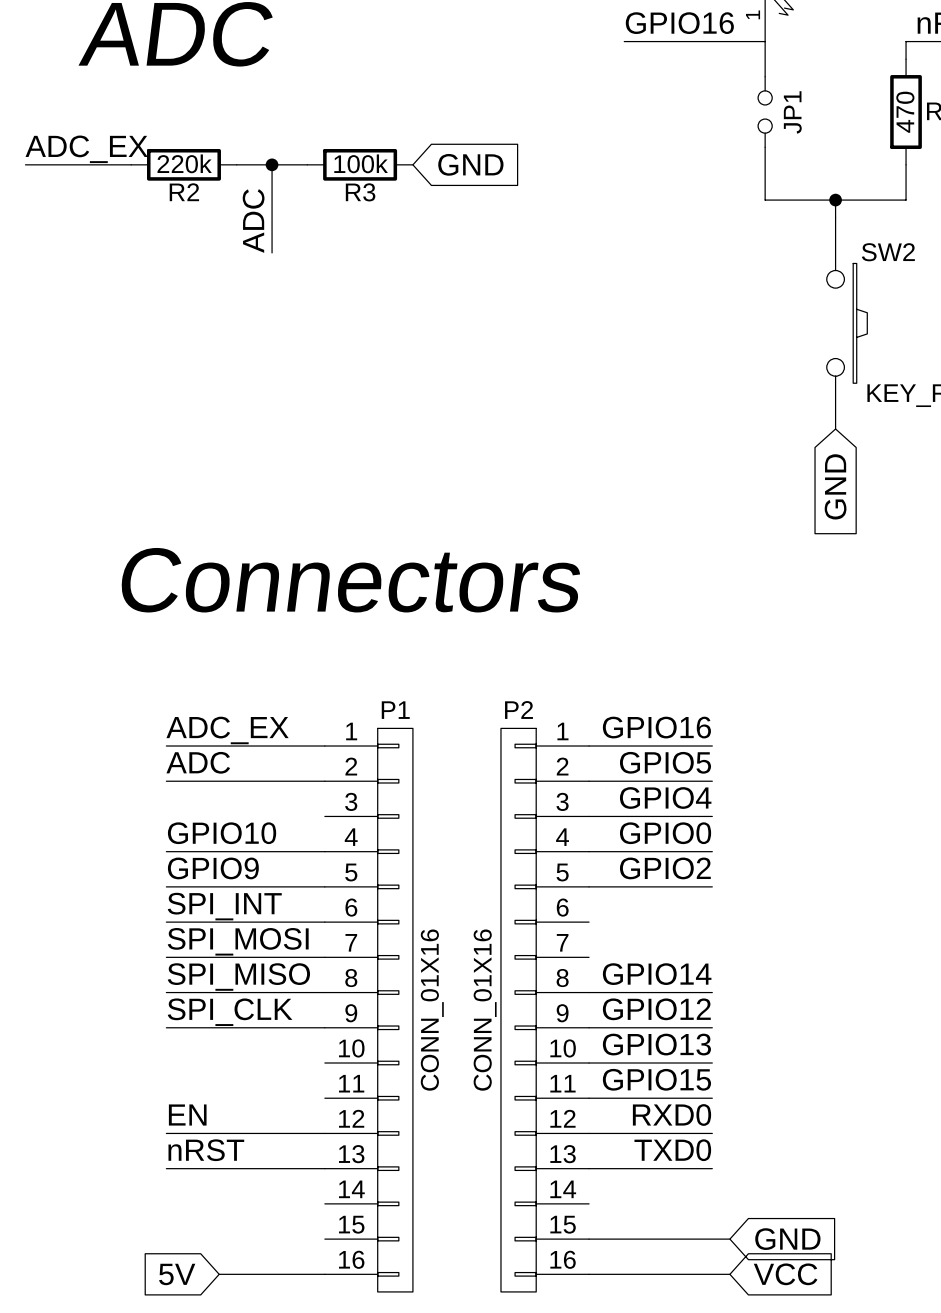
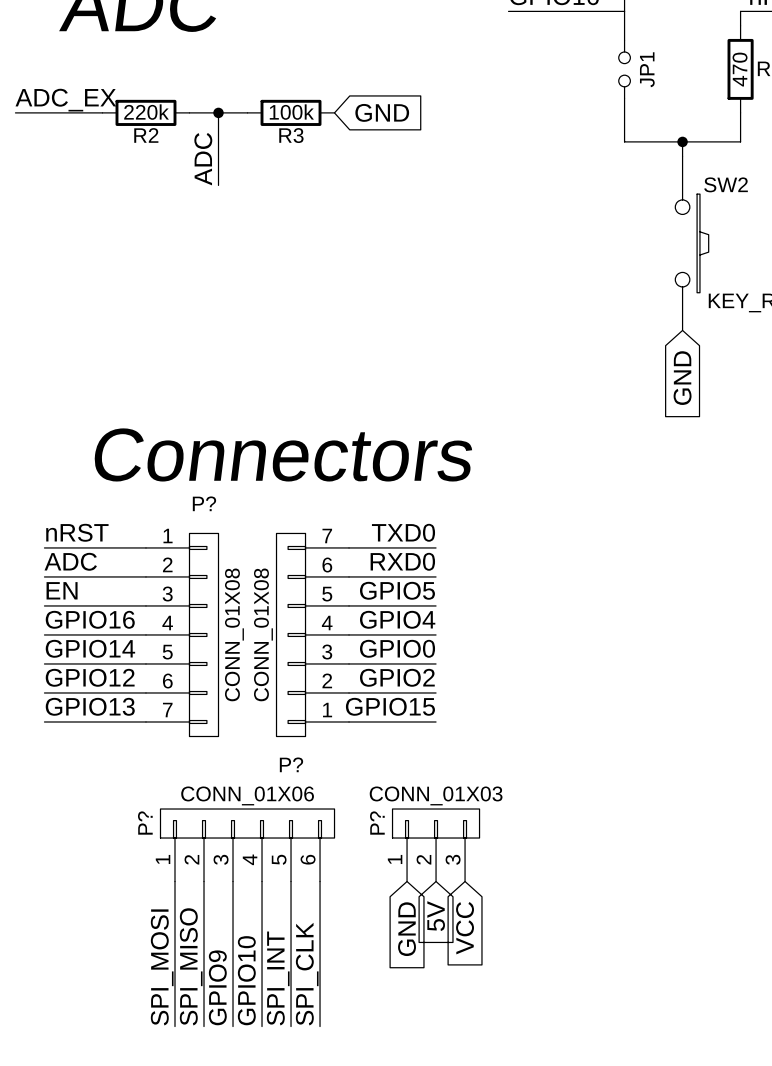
label: none -> nRST (77, 532)
label: none -> TXD0 (403, 532)
wire: none -> (44, 547) (145, 547)
wire: none -> (349, 547) (436, 547)
label: none -> RXD0 (402, 561)
label: GPIO16 (656, 727) -> none
wire: none -> (44, 576) (145, 576)
wire: none -> (349, 576) (436, 576)
label: ADC_EX (227, 730) -> none
label: none -> EN (62, 590)
wire: (166, 746) (324, 746) -> none
wire: (589, 746) (712, 746) -> none
label position: ADC (198, 762) -> ADC (70, 561)
label position: GPIO5 (665, 762) -> GPIO5 (397, 590)
wire: none -> (44, 605) (145, 605)
wire: none -> (349, 605) (436, 605)
label: none -> GPIO16 (90, 619)
wire: (166, 781) (324, 781) -> none
wire: (589, 781) (712, 781) -> none
wire: none -> (44, 634) (145, 634)
P?: none -> CONN_01X08 (182, 634)
P?: none -> CONN_01X08 (312, 634)
wire: none -> (349, 634) (436, 634)
label position: GPIO4 (665, 798) -> GPIO4 (397, 619)
label: none -> GPIO14 (90, 648)
wire: (589, 816) (712, 816) -> none
label: GPIO10 (222, 833) -> none
label position: GPIO0 (665, 833) -> GPIO0 (397, 648)
wire: none -> (44, 663) (145, 663)
wire: none -> (349, 663) (436, 663)
label: none -> GPIO12 (90, 677)
wire: (166, 851) (324, 851) -> none
wire: (589, 851) (712, 851) -> none
label: GPIO9 (213, 868) -> none
label position: GPIO2 (665, 868) -> GPIO2 (397, 677)
wire: none -> (44, 692) (145, 692)
wire: none -> (349, 692) (436, 692)
label: none -> GPIO13 (90, 706)
wire: (166, 886) (324, 886) -> none
wire: (589, 886) (712, 886) -> none
wire: none -> (44, 721) (145, 721)
wire: none -> (349, 721) (436, 721)
label: SPI_INT (224, 906) -> none
wire: (166, 922) (324, 922) -> none
label rotation: 0° (238, 941) -> 90° counterclockwise (162, 967)
label position: SPI_MOSI (238, 941) -> SPI_MOSI (162, 967)
wire: (166, 957) (324, 957) -> none
label: GPIO14 (657, 974) -> none
label rotation: 0° (238, 977) -> 90° counterclockwise (191, 966)
label position: SPI_MISO (238, 977) -> SPI_MISO (191, 966)
wire: (166, 992) (324, 992) -> none
wire: (589, 992) (712, 992) -> none
label: GPIO12 (656, 1009) -> none
P1: CONN_01X16 (368, 1010) -> none
P2: CONN_01X16 (545, 1010) -> none
label rotation: 0° (230, 1012) -> 90° counterclockwise (307, 974)
label position: SPI_CLK (230, 1012) -> SPI_CLK (307, 974)
wire: (166, 1027) (324, 1027) -> none
wire: (589, 1027) (712, 1027) -> none
label: GPIO13 (656, 1044) -> none
P?: none -> CONN_01X06 (247, 845)
P?: none -> CONN_01X03 (436, 845)
wire: (589, 1063) (712, 1063) -> none
label position: GPIO15 (656, 1079) -> GPIO15 (390, 706)
wire: none -> (204, 881) (204, 1026)
wire: none -> (233, 881) (233, 1026)
wire: none -> (262, 881) (262, 1026)
wire: none -> (291, 881) (291, 1026)
wire: none -> (320, 881) (320, 1026)
wire: (589, 1098) (712, 1098) -> none
label: EN (187, 1115) -> none
label: RXD0 (672, 1115) -> none
wire: (166, 1133) (324, 1133) -> none
wire: (589, 1133) (712, 1133) -> none
global label: none -> 5V (436, 916)
label: nRST (206, 1150) -> none
label: TXD0 (672, 1150) -> none
wire: (166, 1168) (324, 1168) -> none
wire: (589, 1168) (712, 1168) -> none
label: none -> SPI_INT (278, 978)
label: none -> GPIO10 (246, 980)
label: none -> GPIO9 (217, 987)
wire: (589, 1239) (729, 1239) -> none
global label rotation: 0° (787, 1239) -> 90° clockwise (407, 929)
global label position: GND (787, 1239) -> GND (407, 929)
global label: 5V (177, 1274) -> none
wire: (219, 1274) (324, 1274) -> (174, 1026) (174, 881)
wire: (589, 1274) (729, 1274) -> none
global label rotation: 0° (785, 1274) -> 90° clockwise (465, 928)
global label position: VCC (785, 1274) -> VCC (465, 928)

